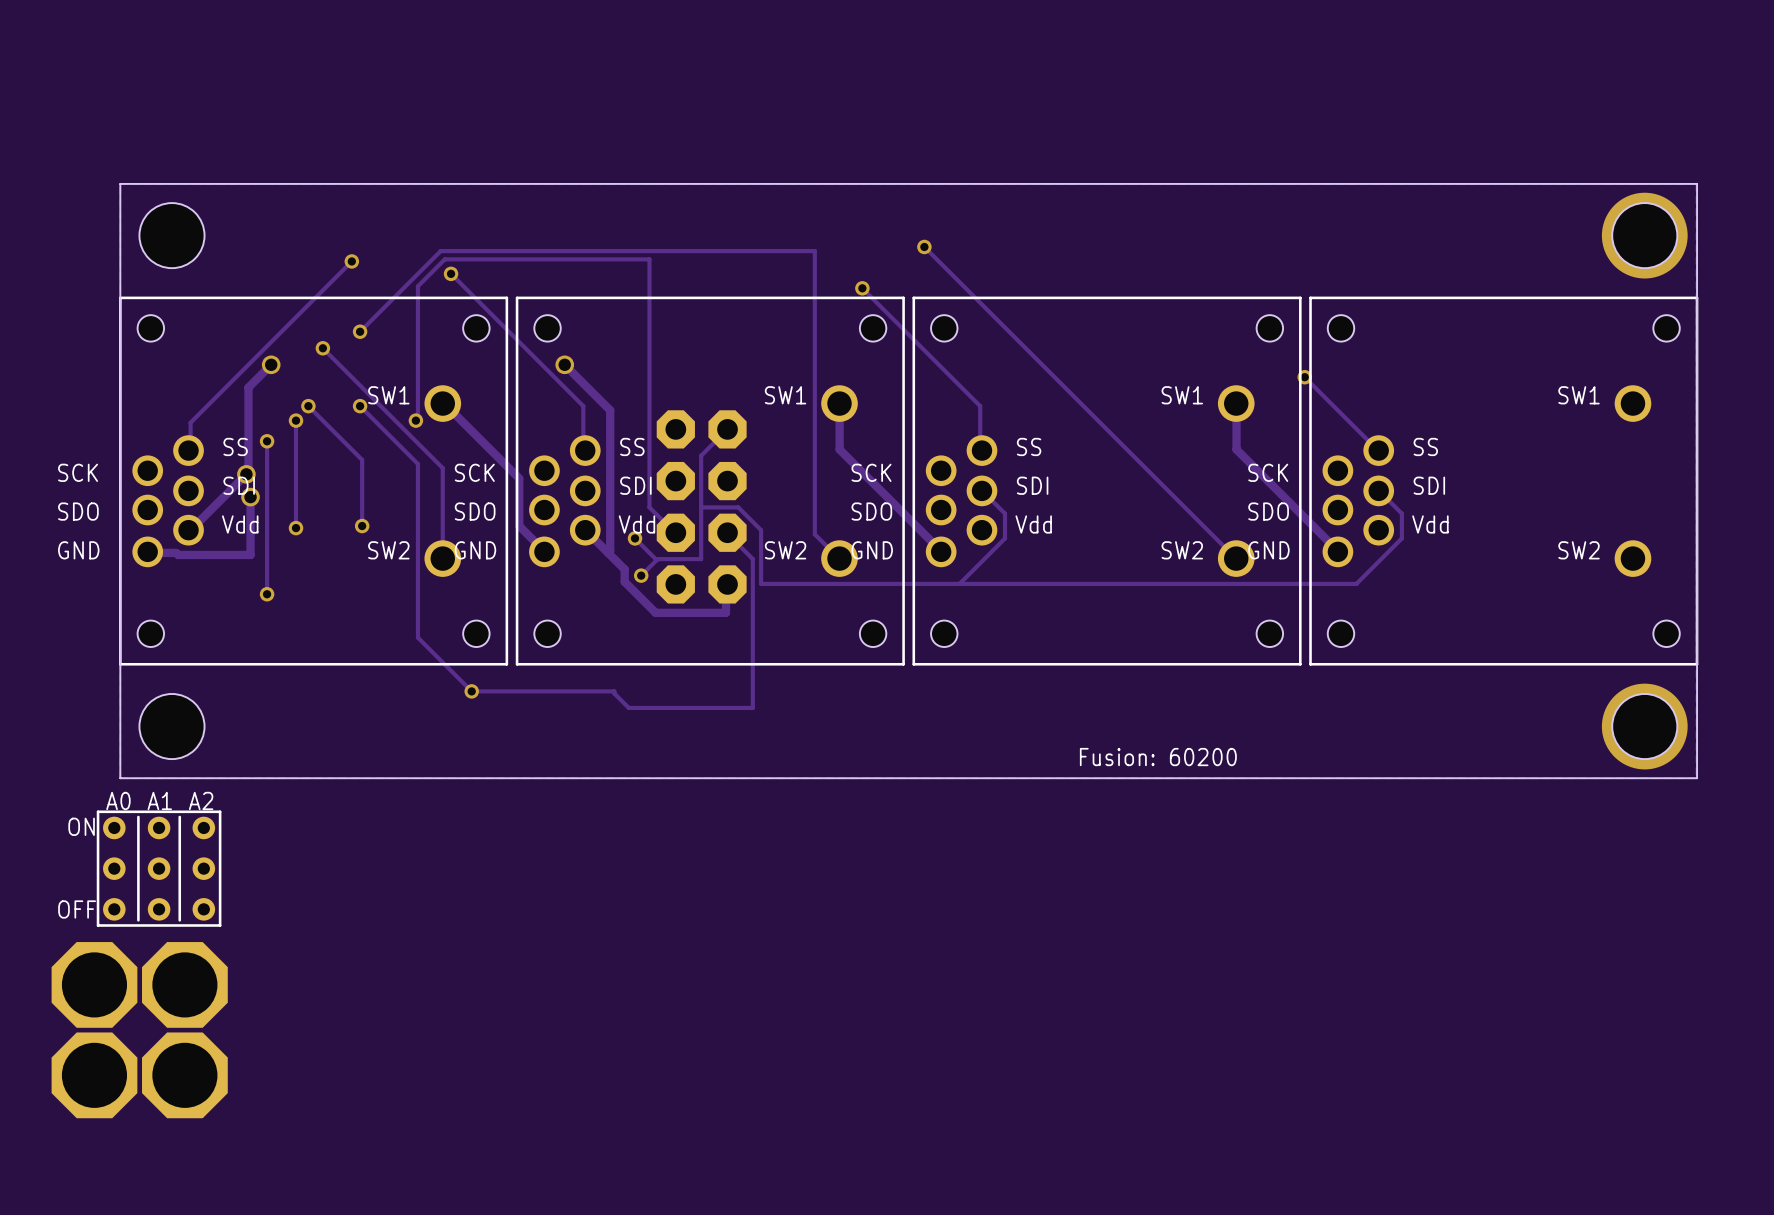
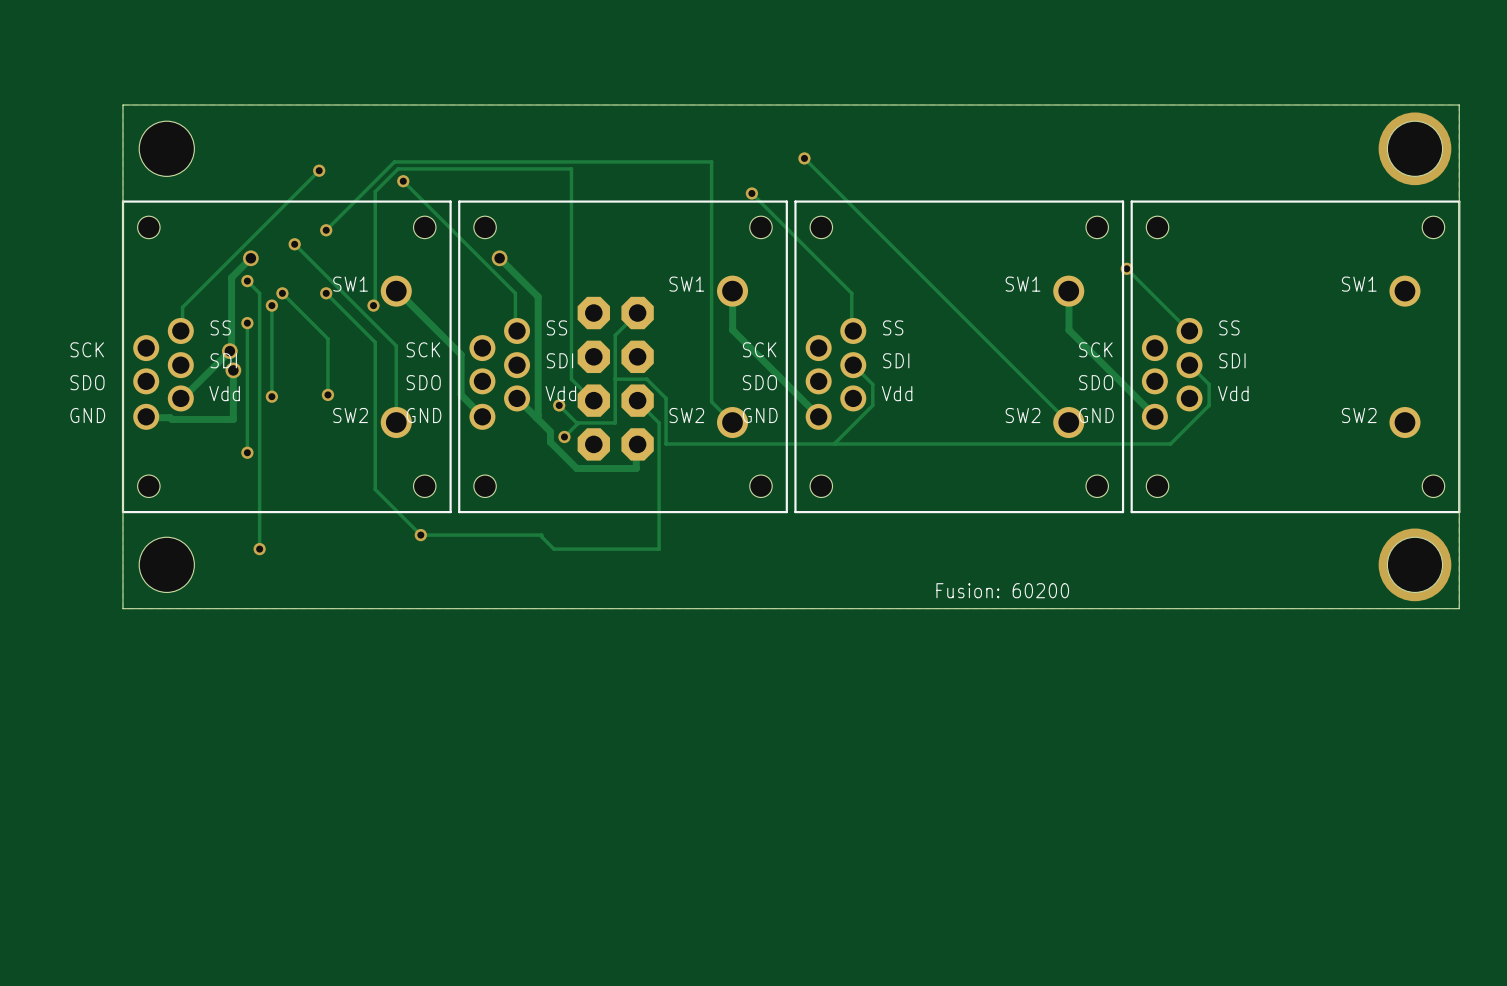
track: none -> (247, 281) (259, 293) (259, 549)
via: none -> (247, 281)
via: none -> (259, 549)
part: (159, 868) -> none
part: (94, 984) -> none
part: (184, 984) -> none
part: (94, 1075) -> none
part: (184, 1075) -> none

